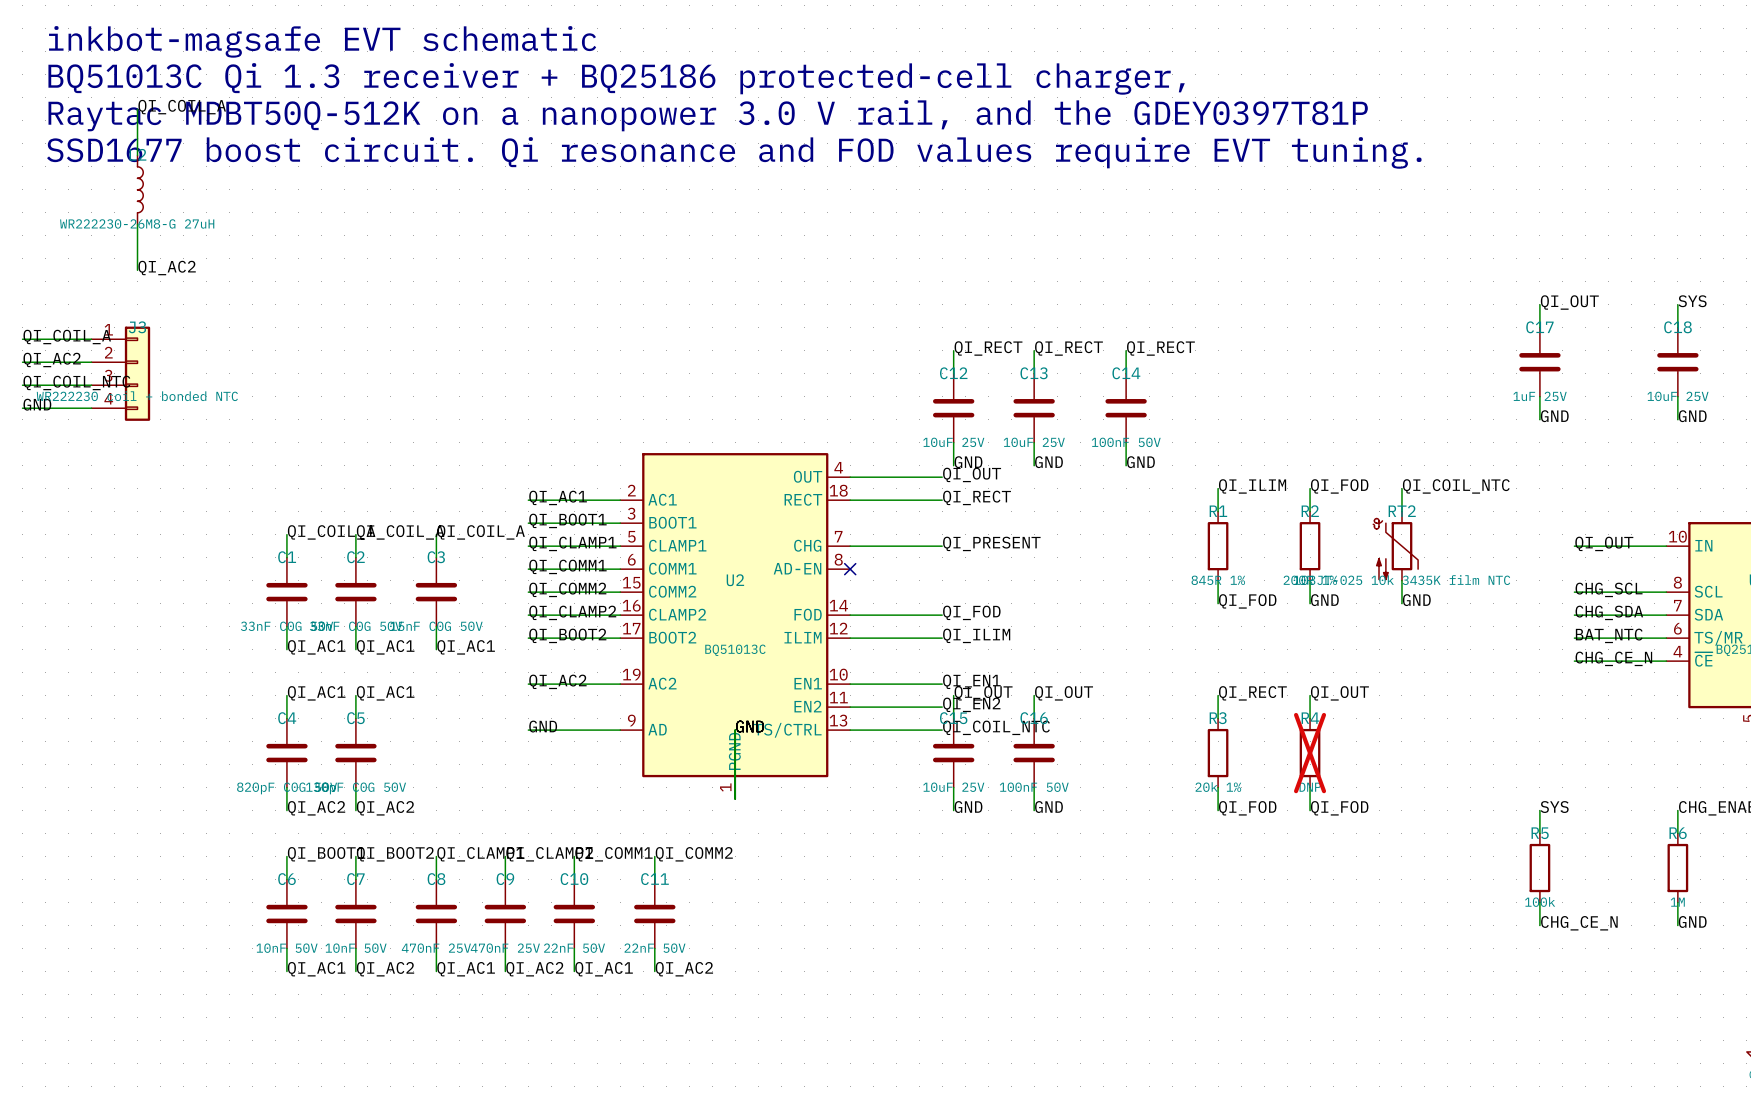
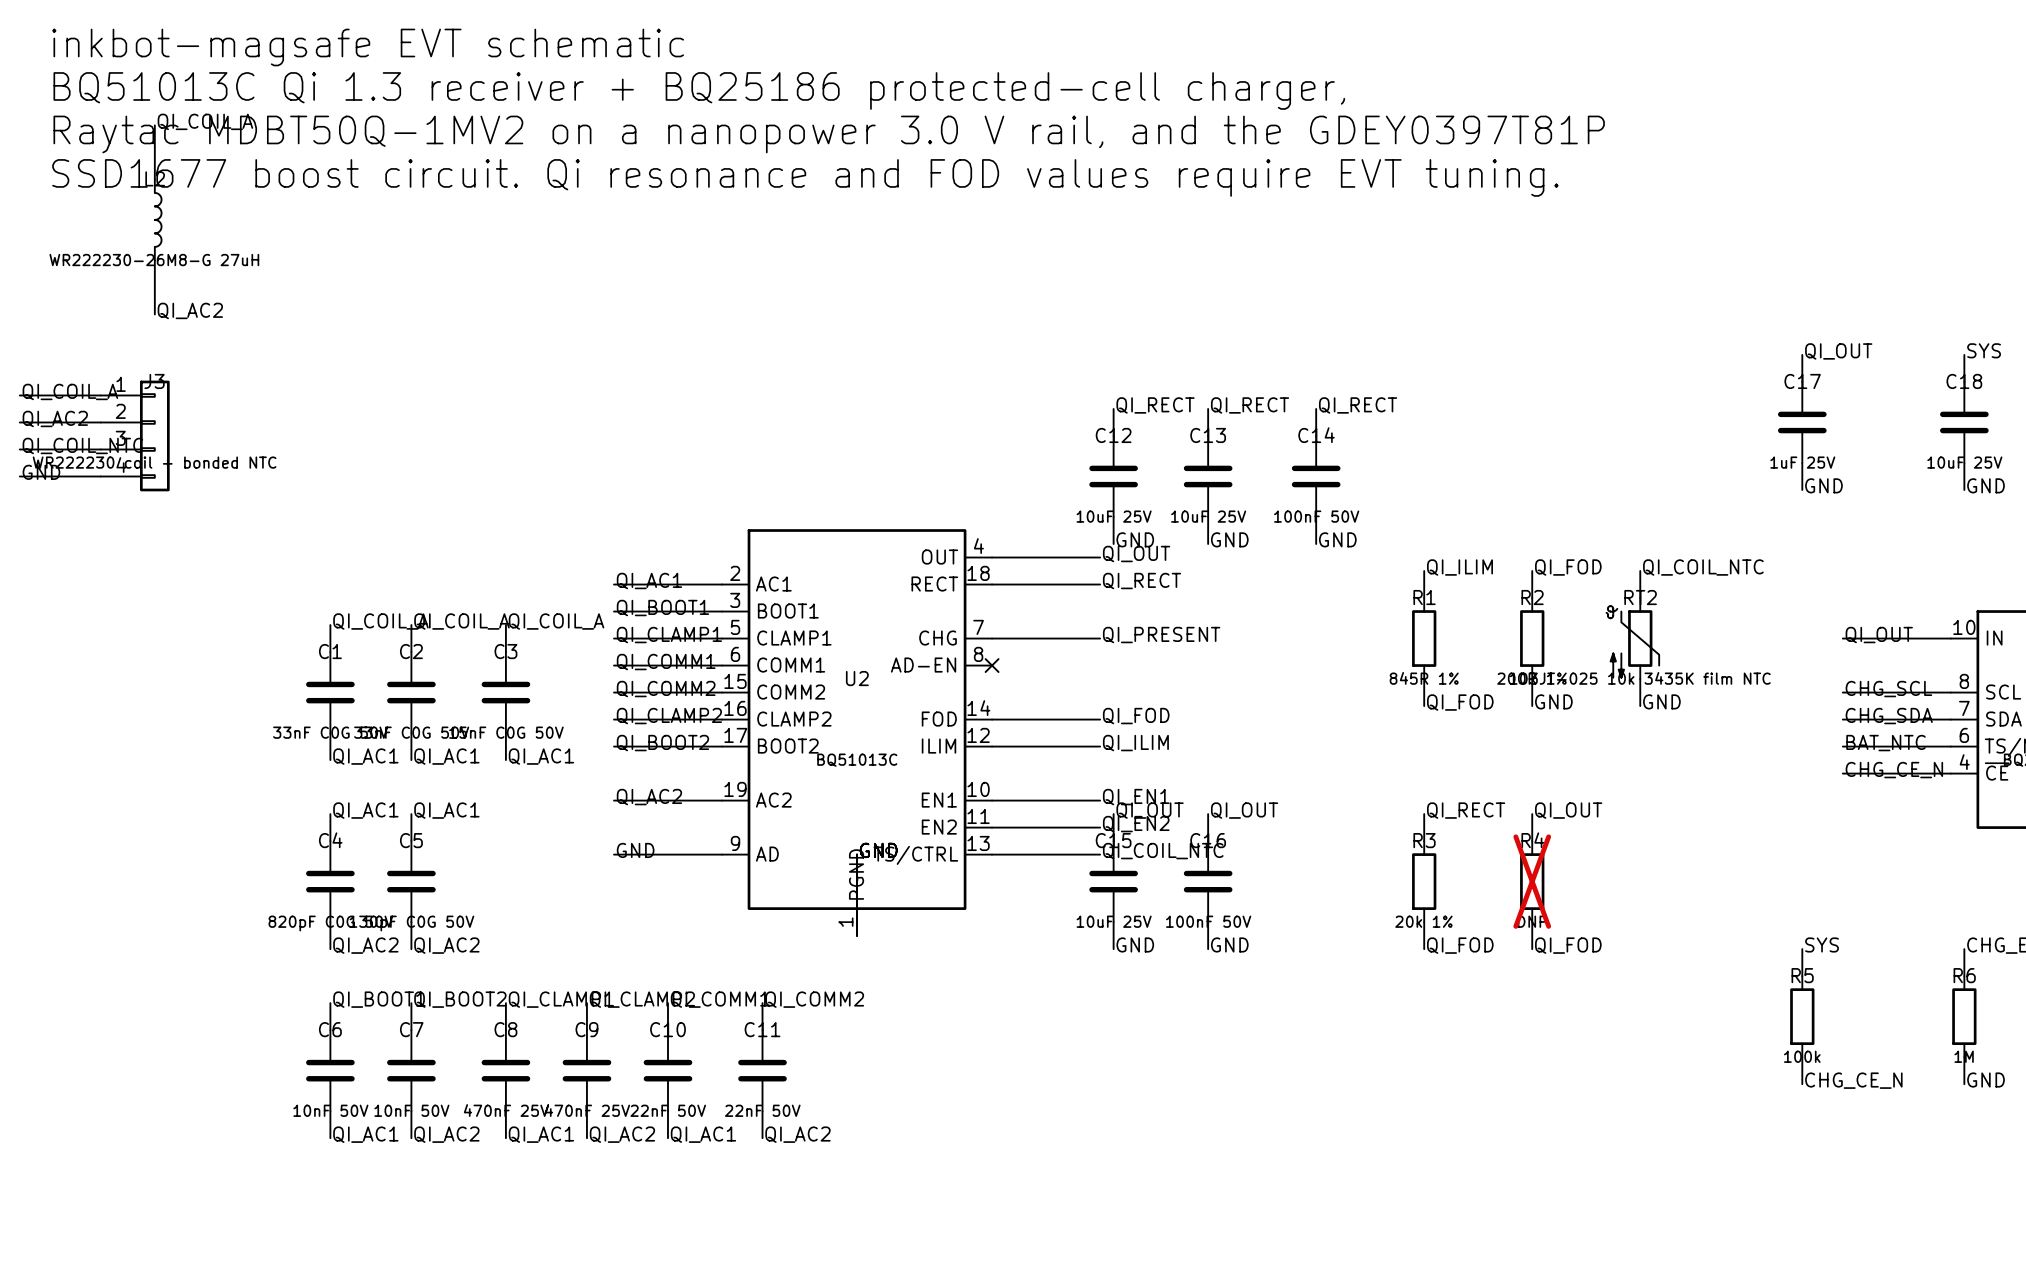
text: Raytac MDBT50Q-512K on a nanopower 3.0 V rail, and the GDEY0397T81P (708, 115) -> Raytac MDBT50Q-1MV2 on a nanopower 3.0 V rail, and the GDEY0397T81P (829, 134)

